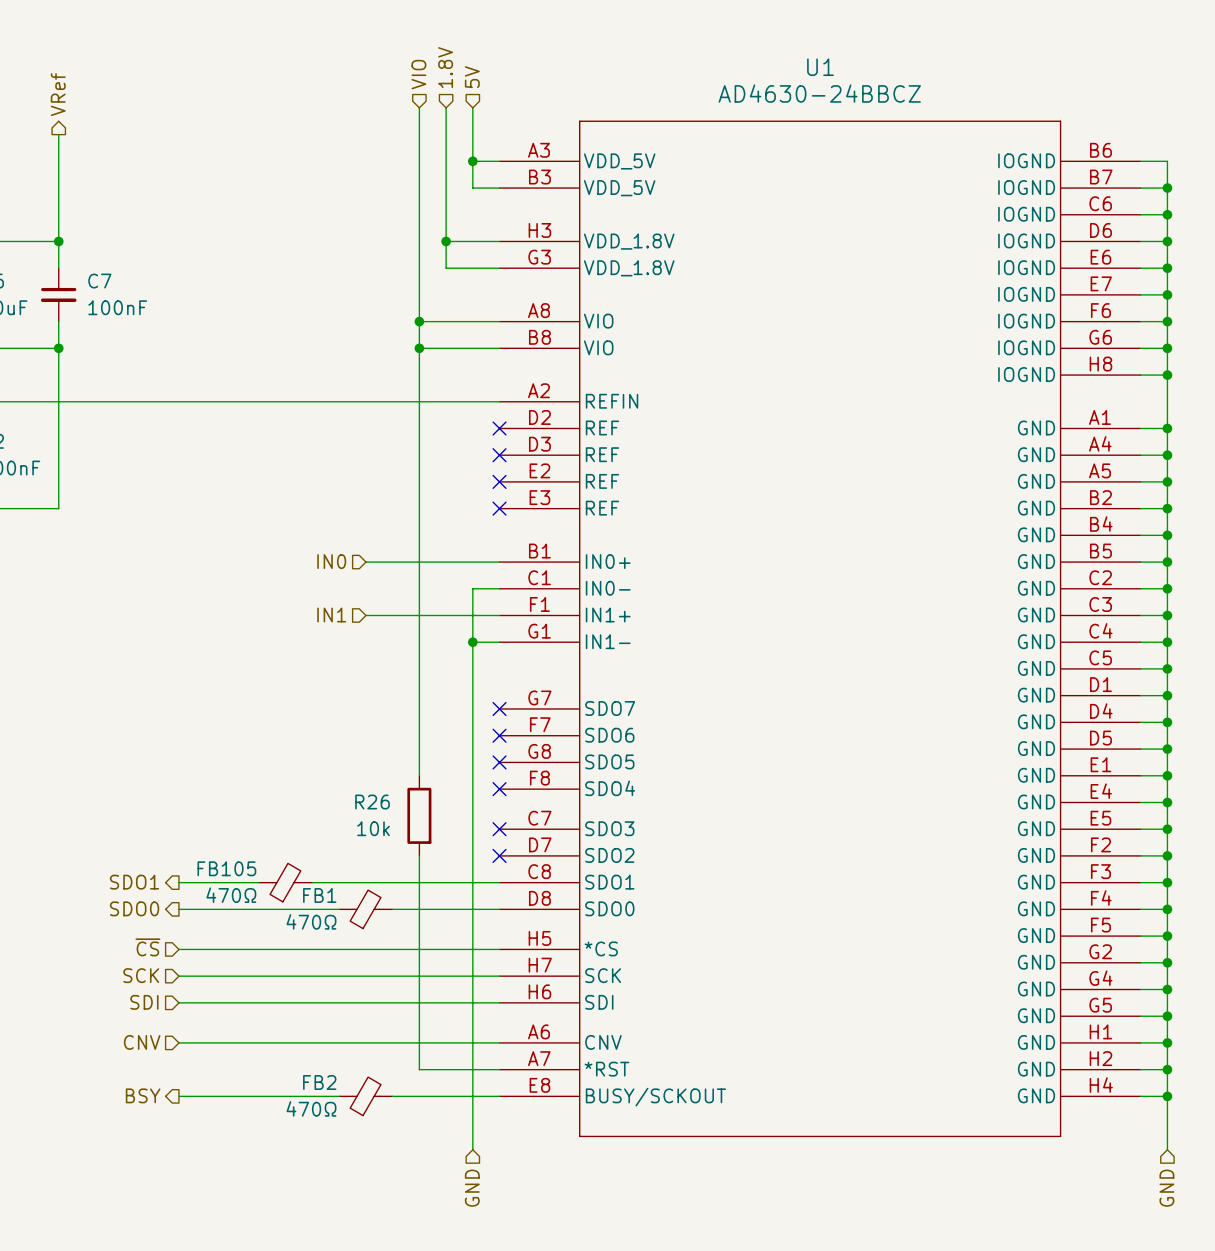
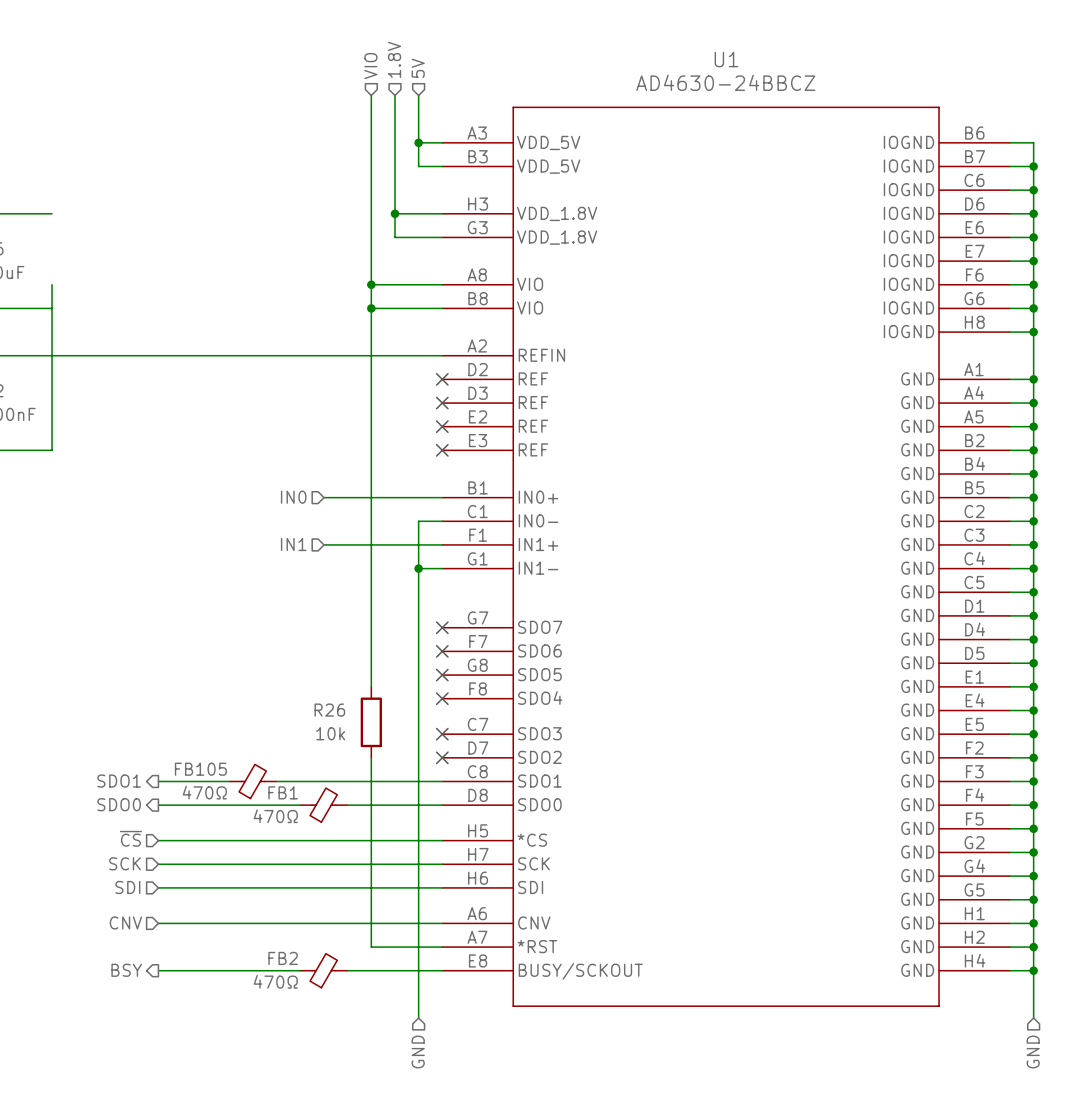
hierarchical label: VRef (58, 94) -> none
wire: (58, 134) (58, 268) -> none
junction: (58, 241) -> none
C7: 100nF (58, 294) -> none
junction: (58, 348) -> none

